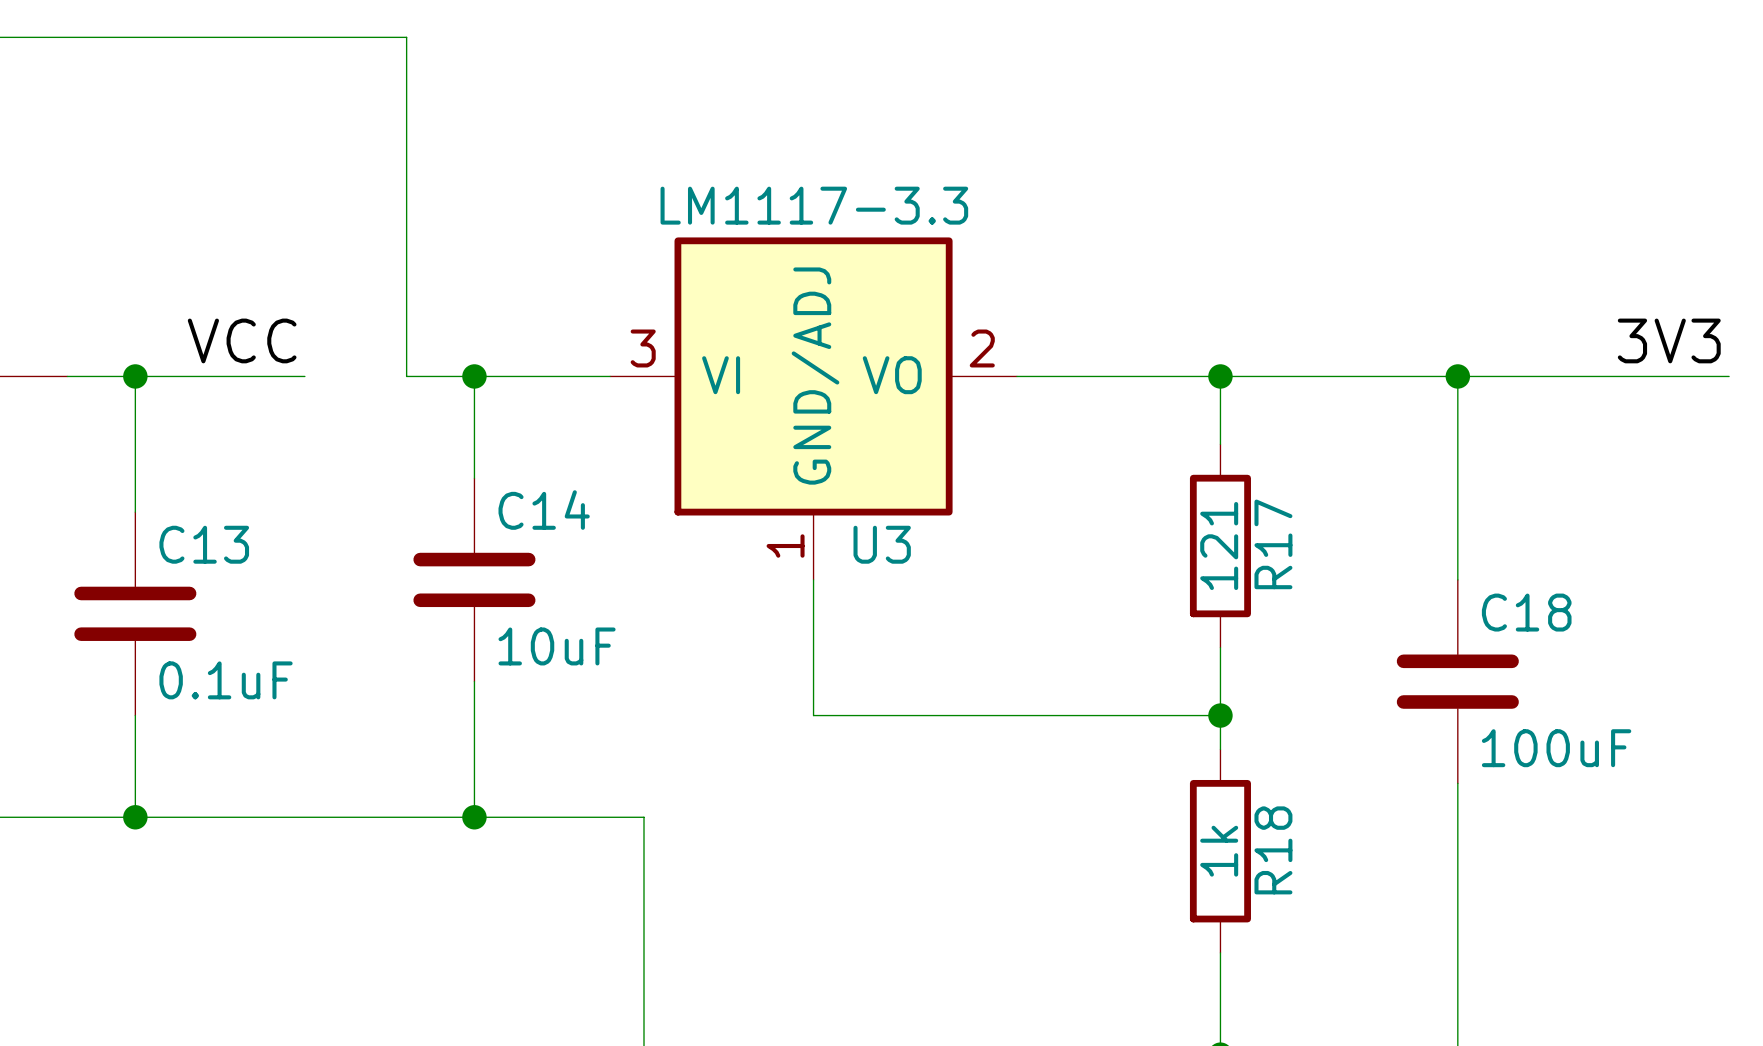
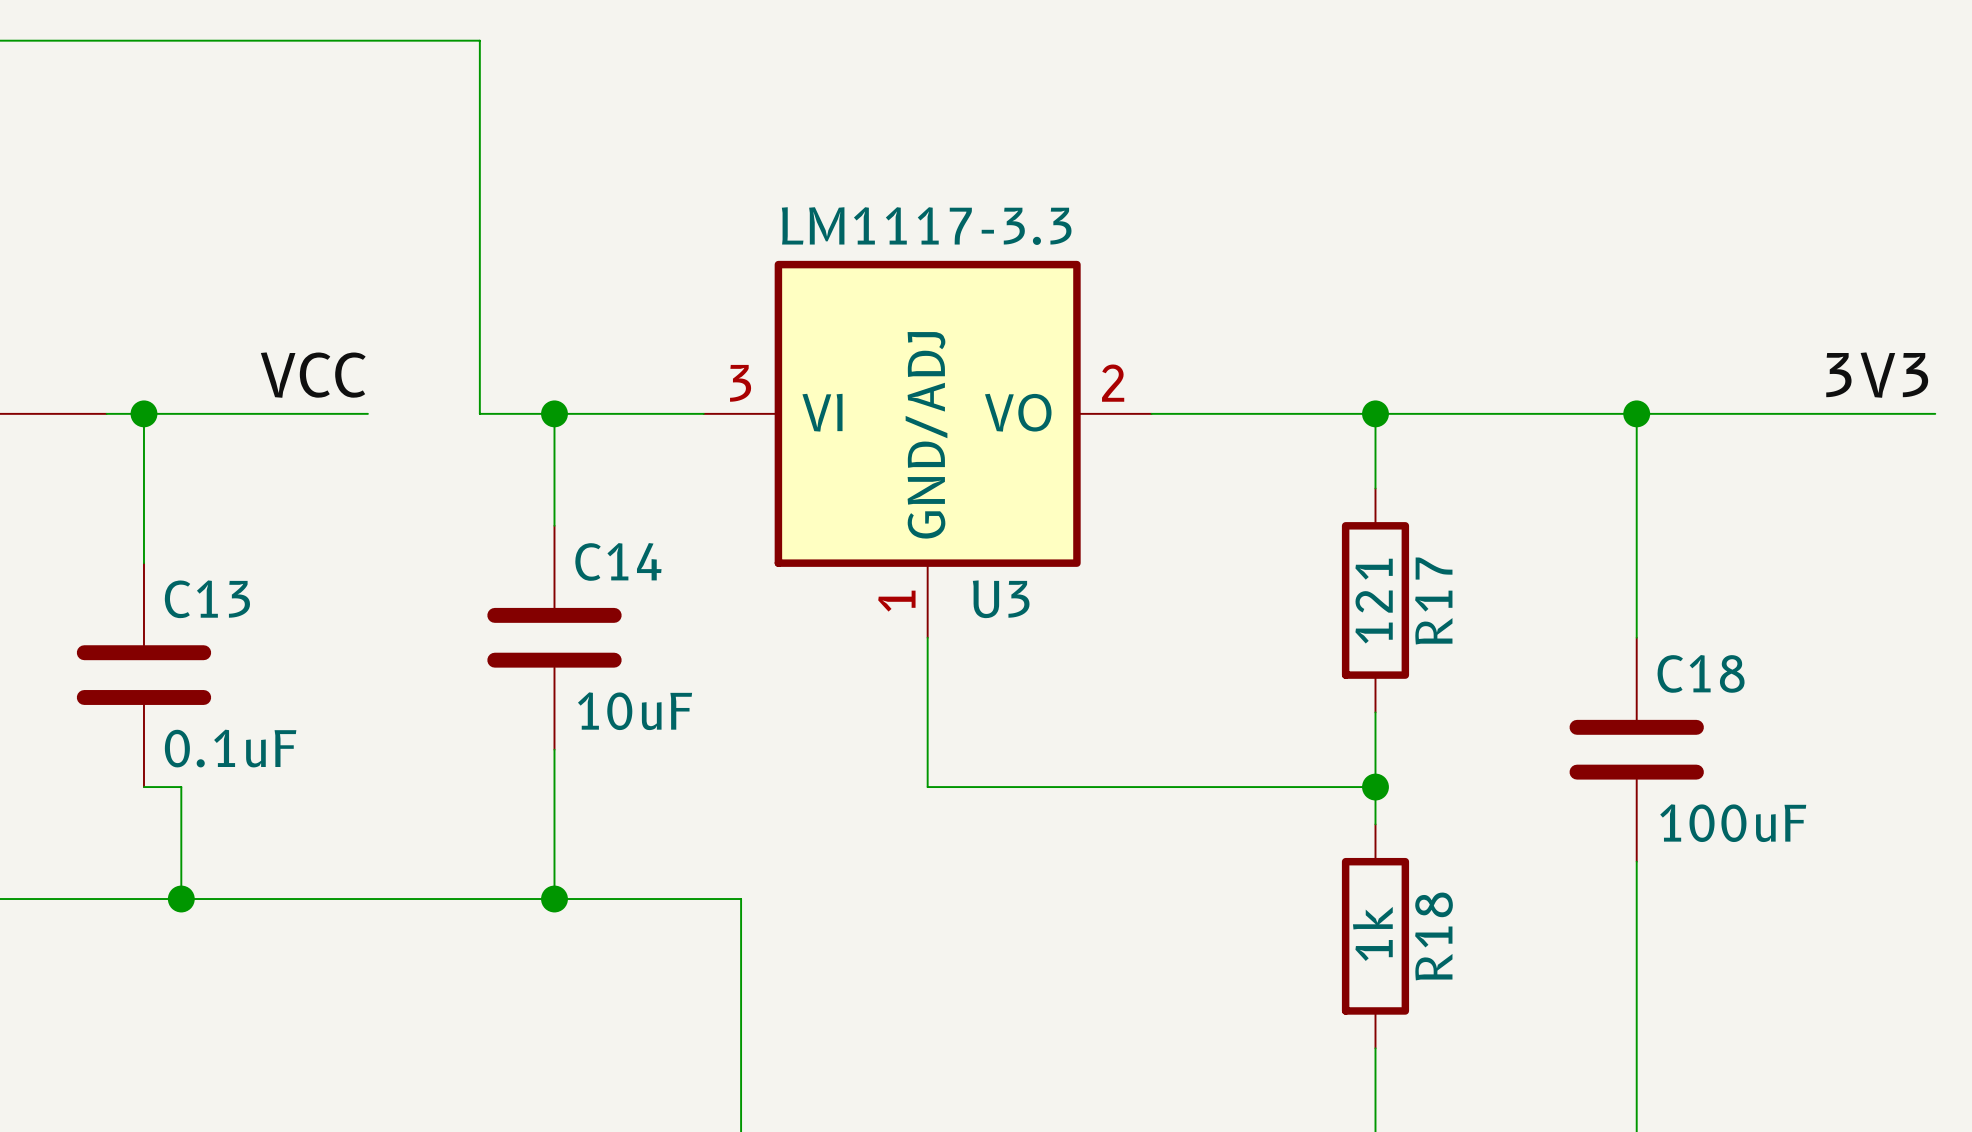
wire: (135, 376) (135, 512) -> (143, 413) (143, 563)
junction position: (135, 376) -> (143, 413)
C13 position: (135, 613) -> (143, 675)
wire: none -> (143, 787) (181, 787)

